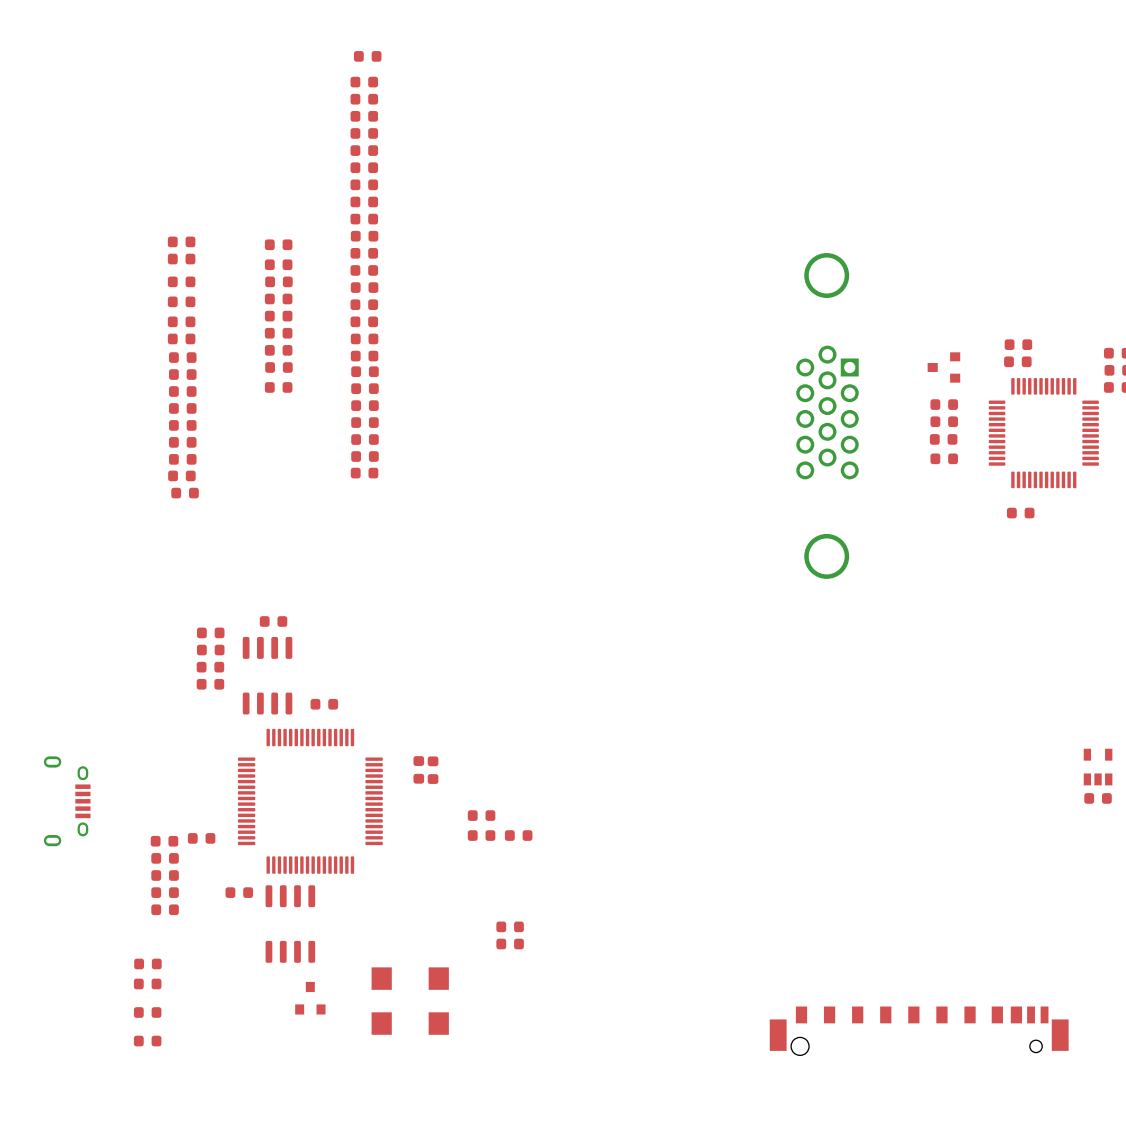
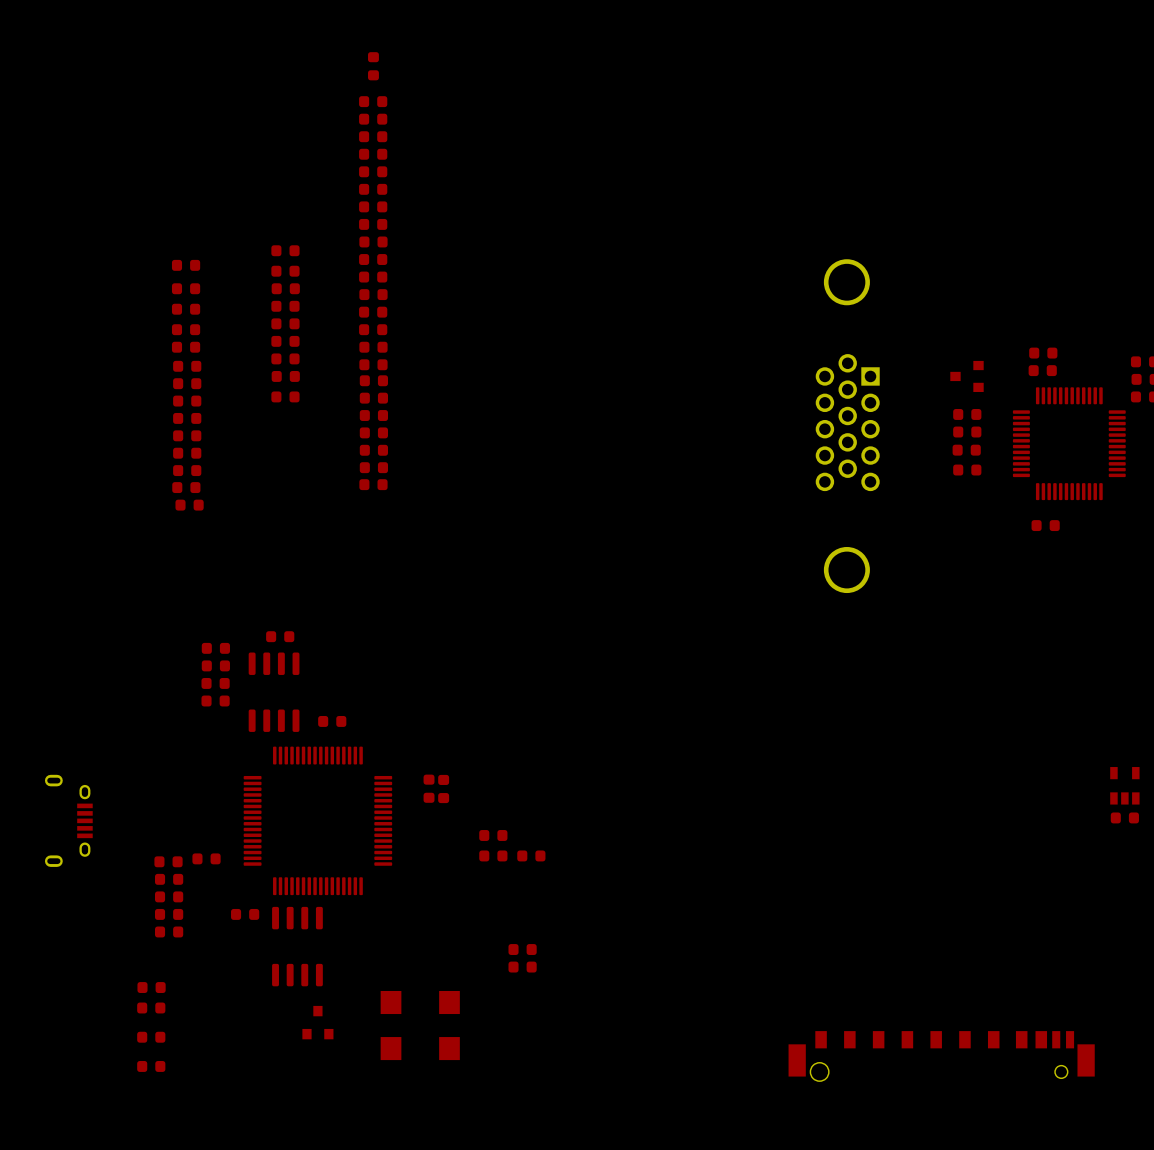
part: (367, 56) -> none
part: none -> (373, 66)
part: (364, 82) -> none
part: (181, 241) -> none

